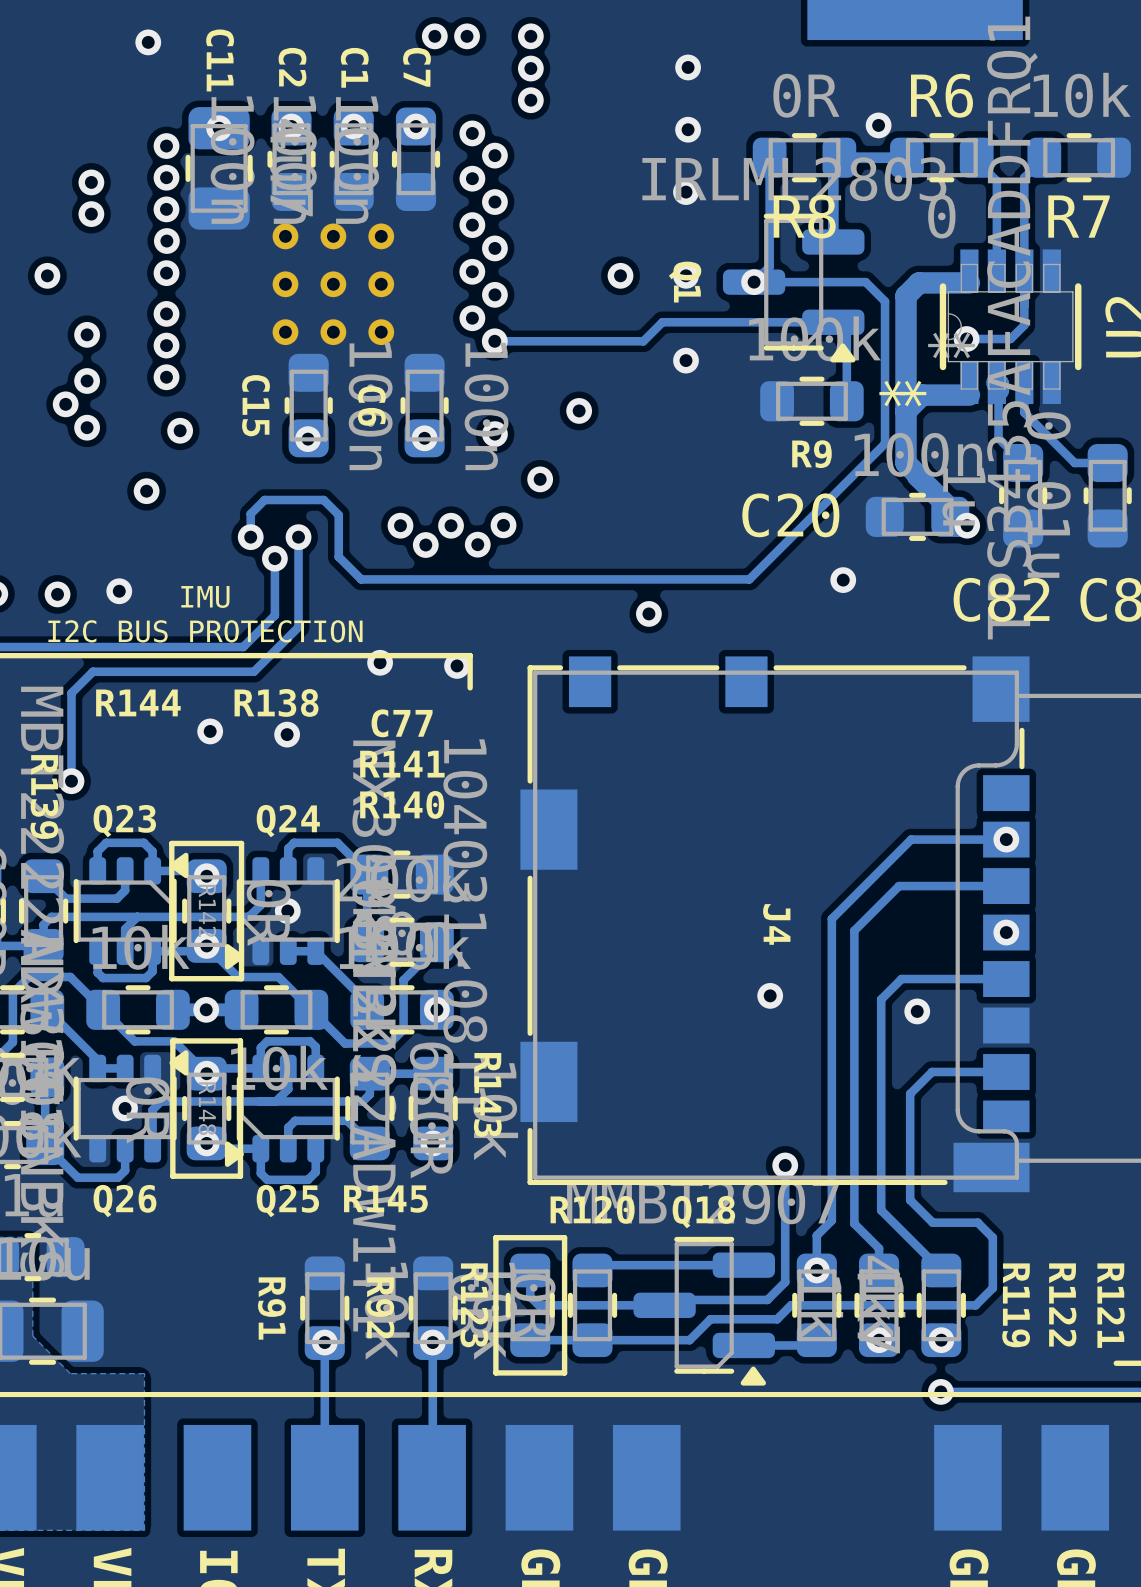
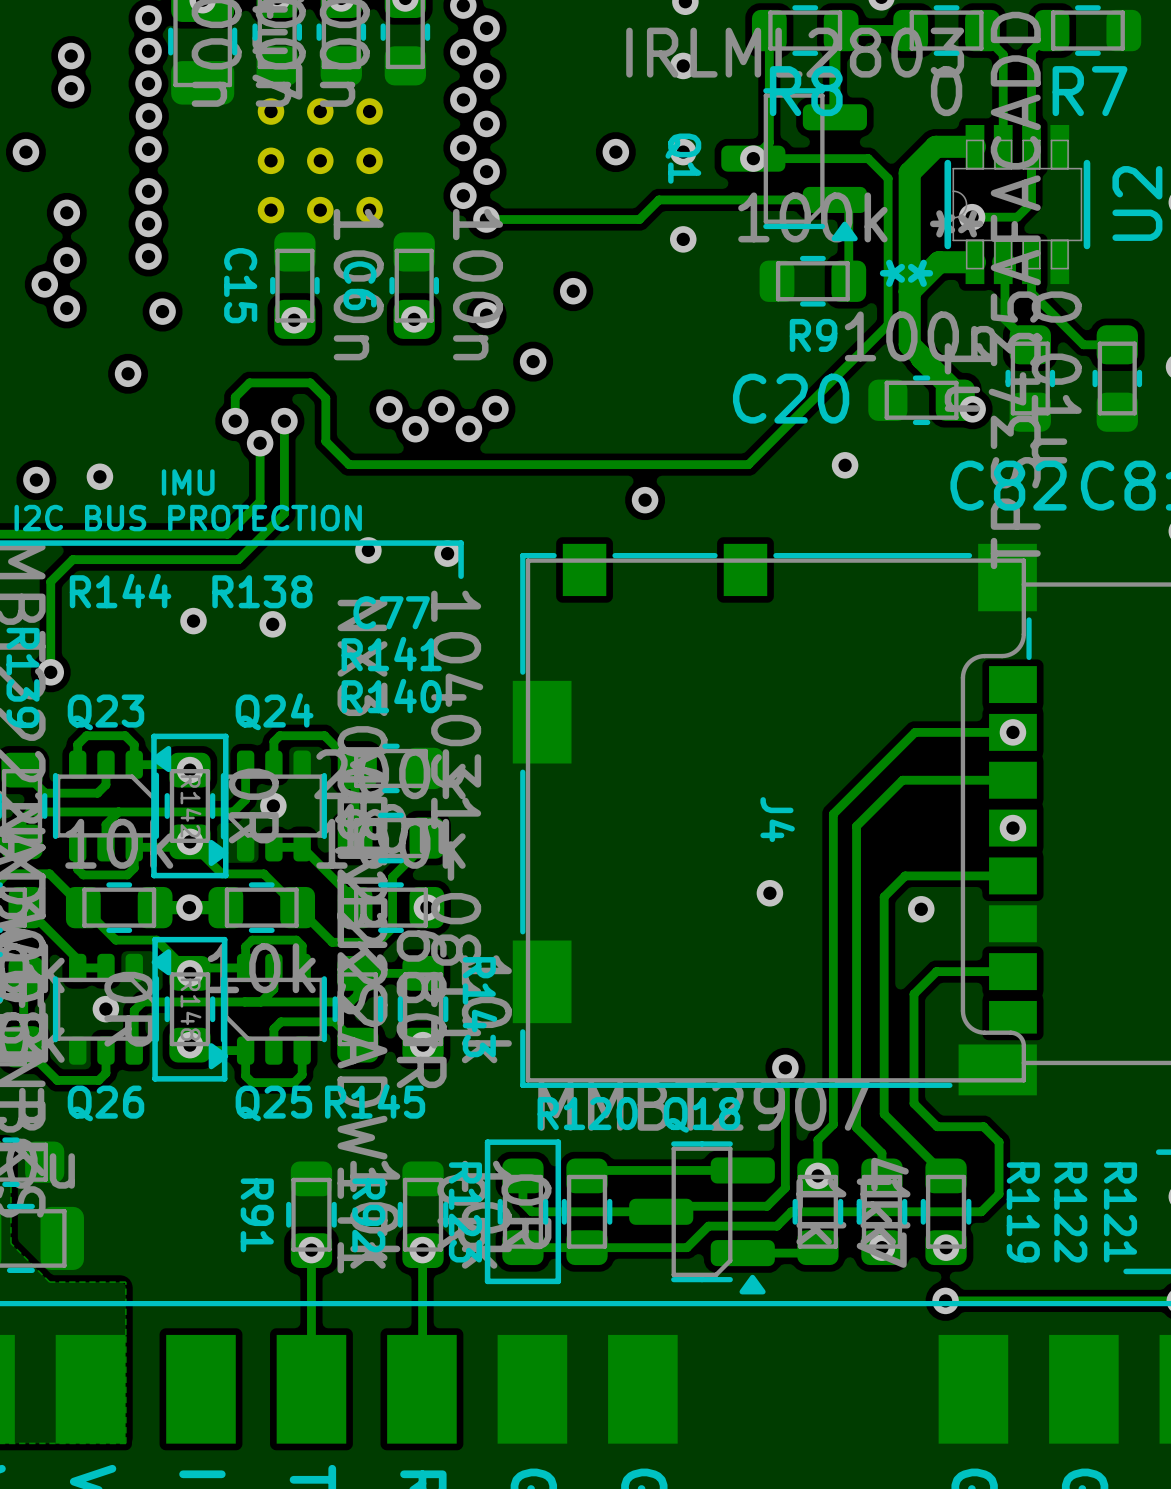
track: (969, 282) (919, 282) -> (974, 146) (935, 146) (923, 159)
track: (969, 395) (922, 395) -> (974, 262) (938, 262) (926, 274)

